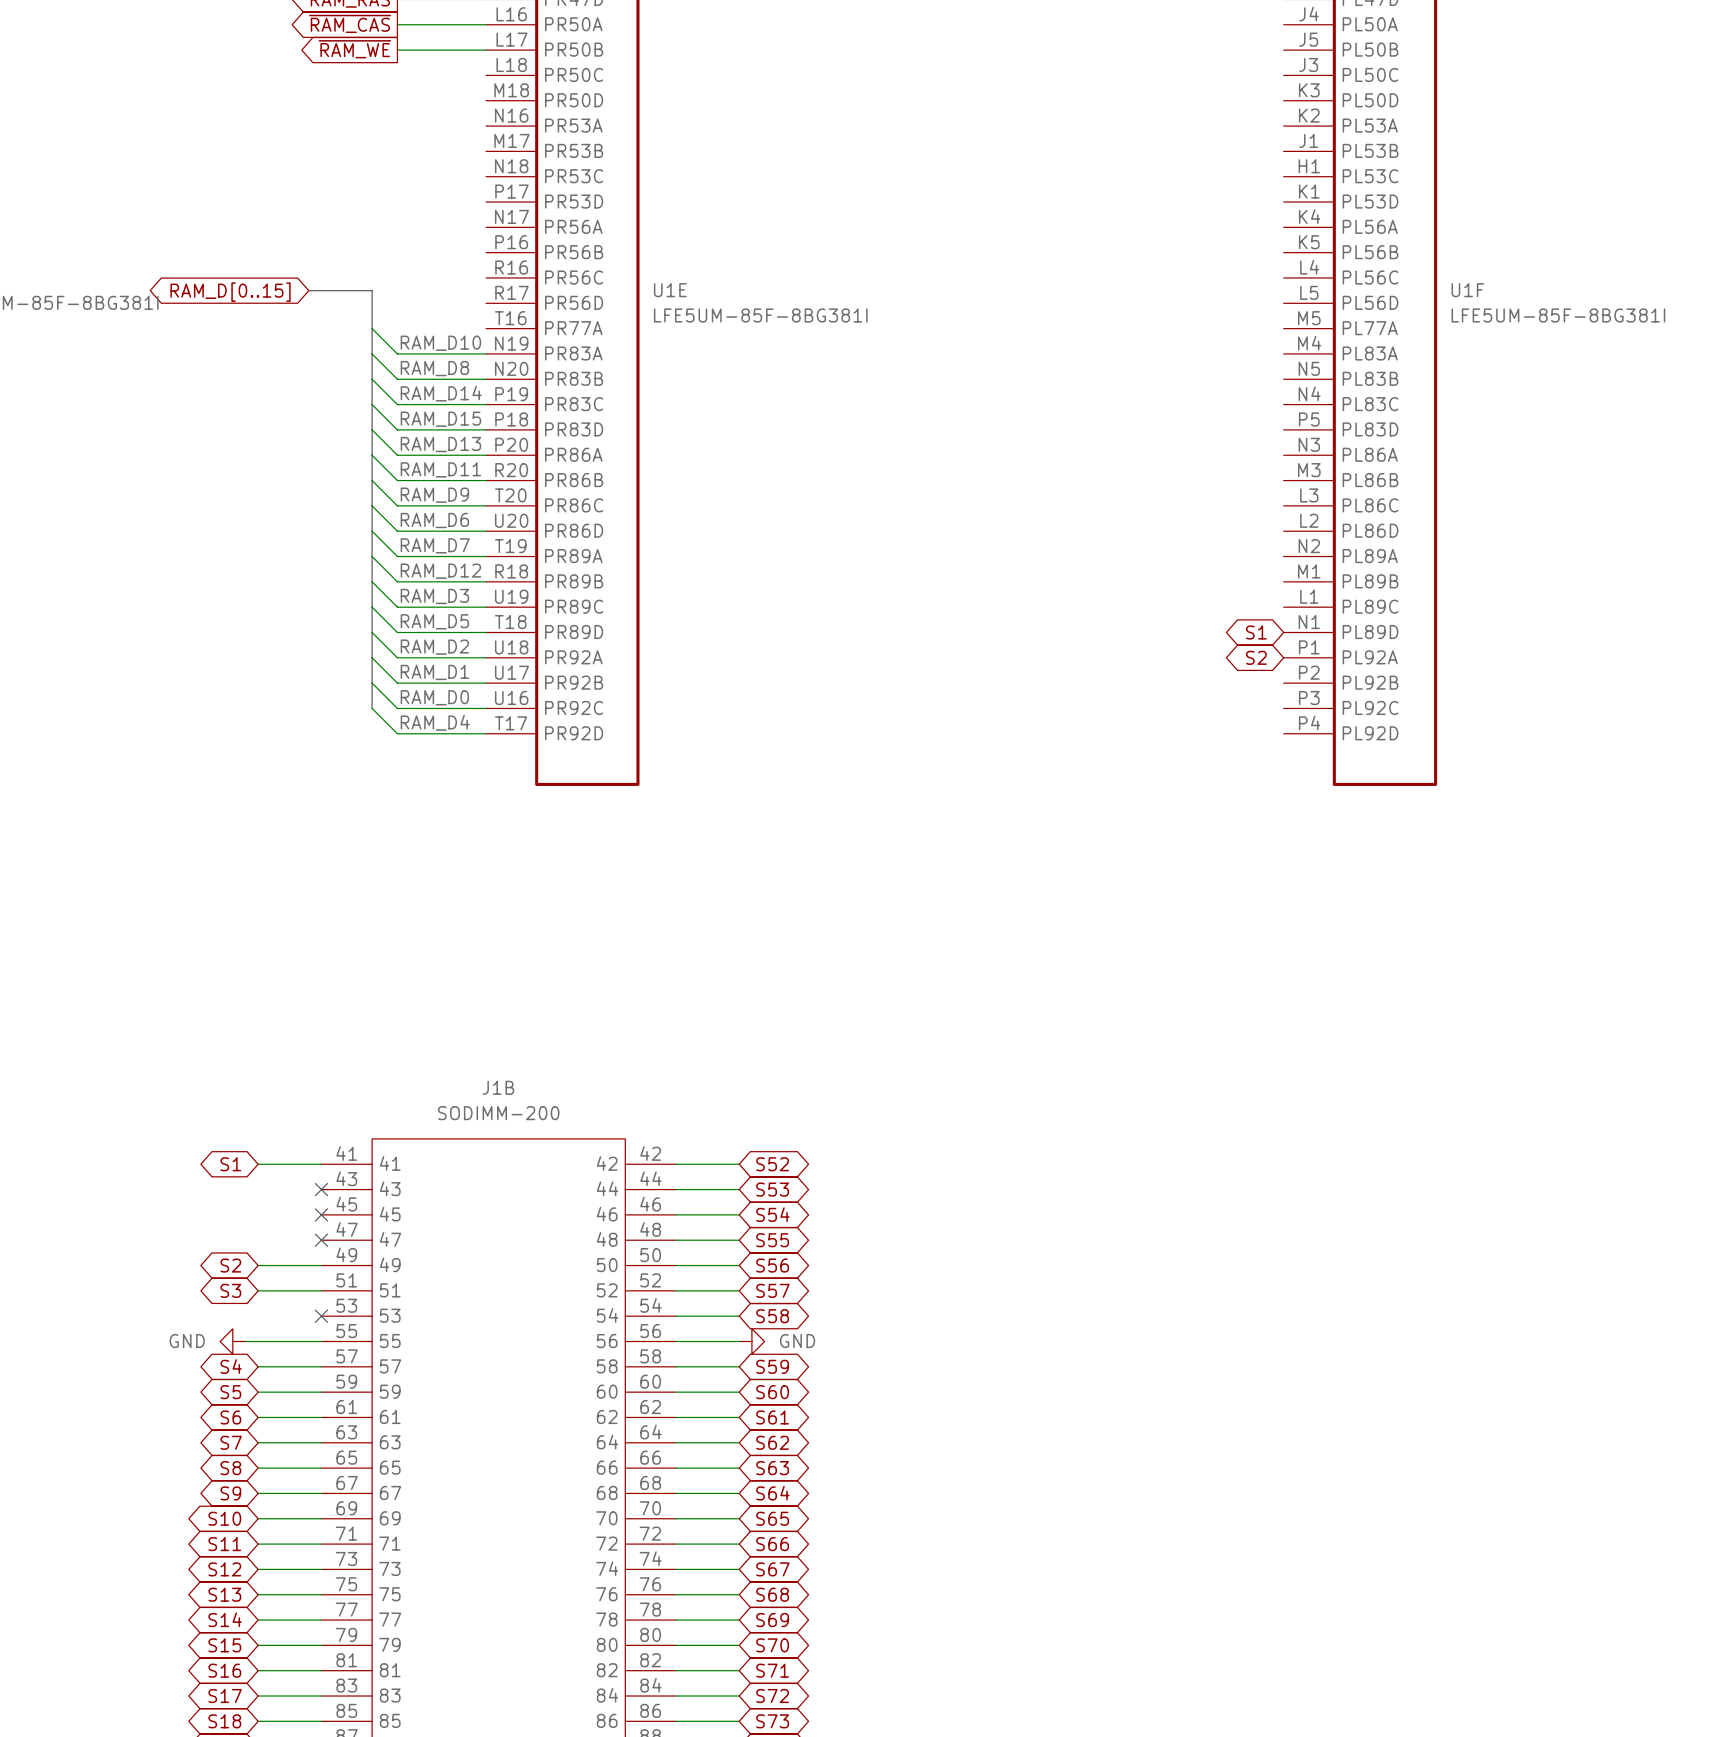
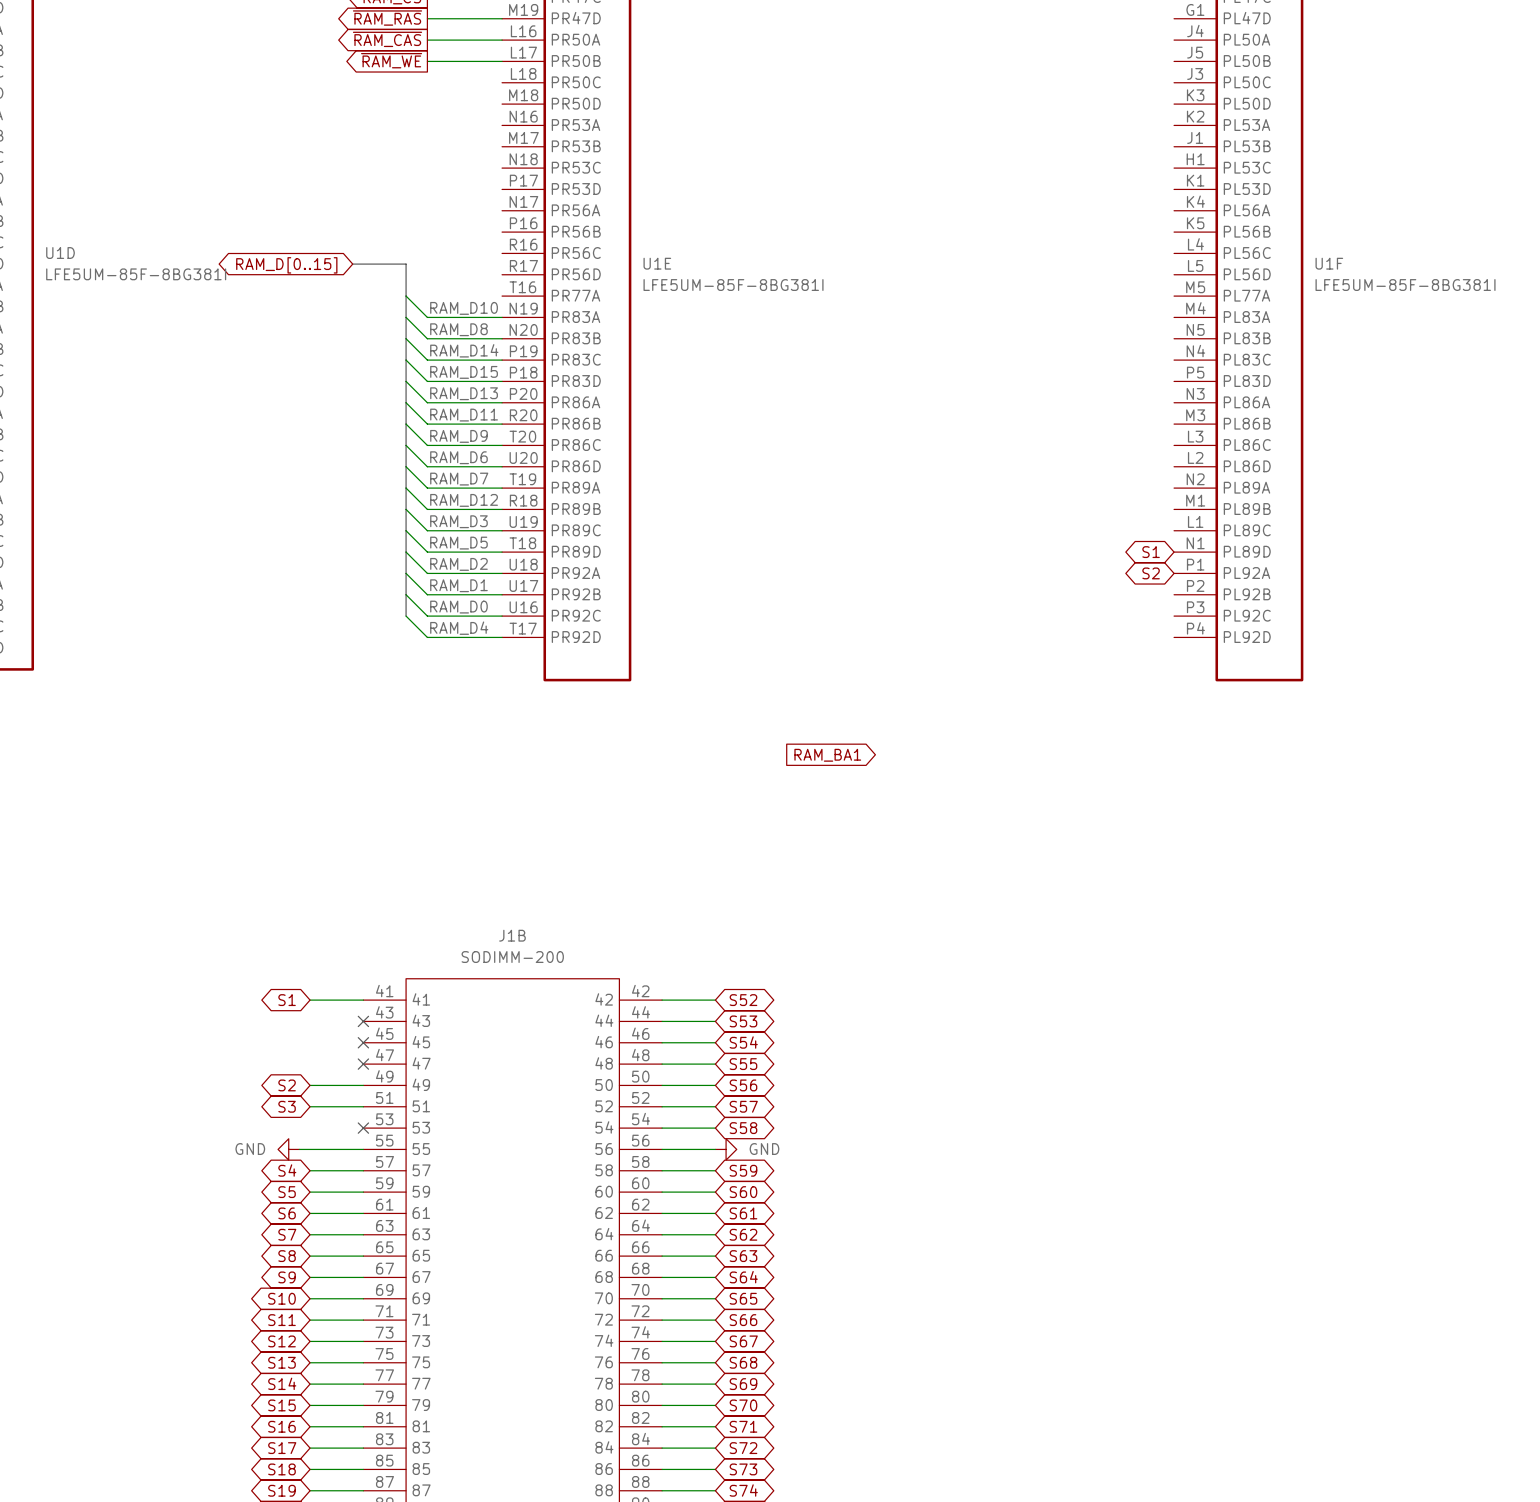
global label: none -> RAM_BA1 (827, 755)

